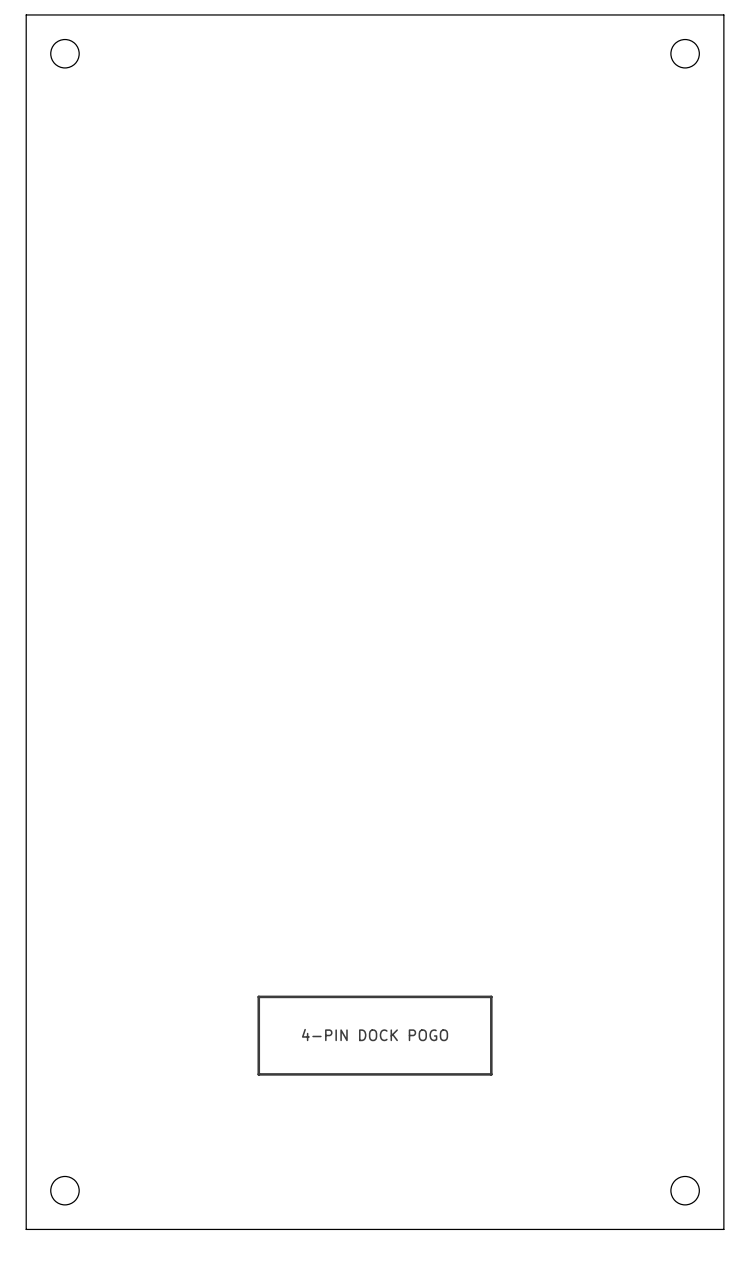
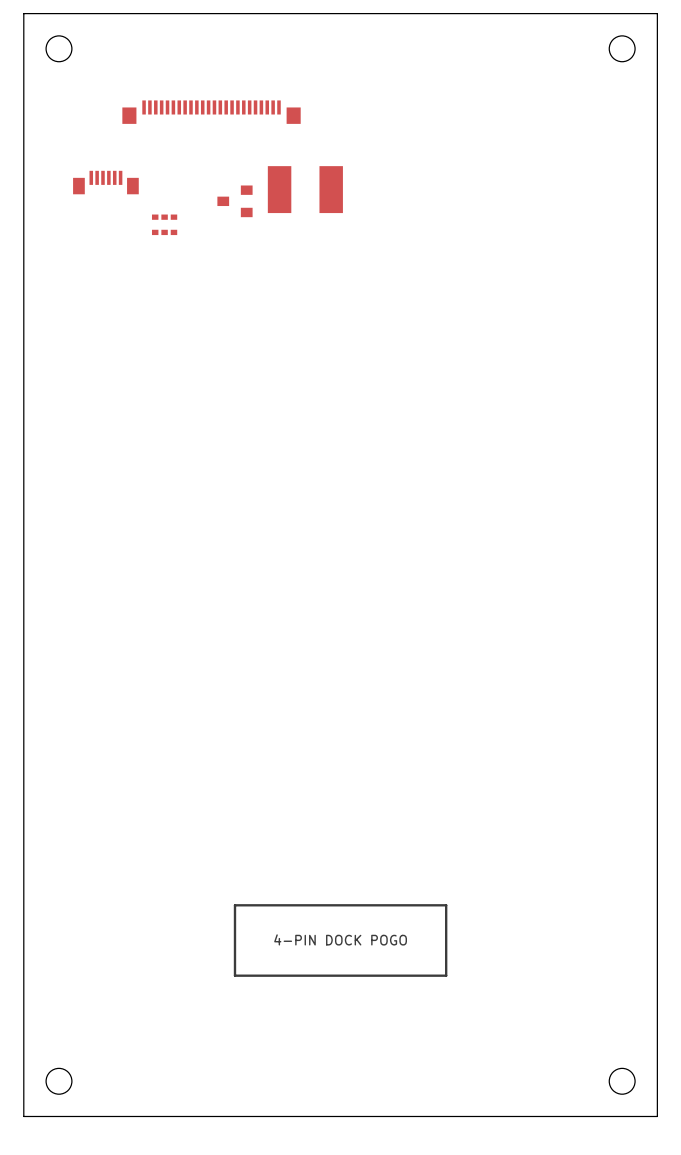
part: none -> (211, 112)
part: none -> (105, 182)
part: none -> (305, 189)
part: none -> (234, 201)
part: none -> (164, 224)

